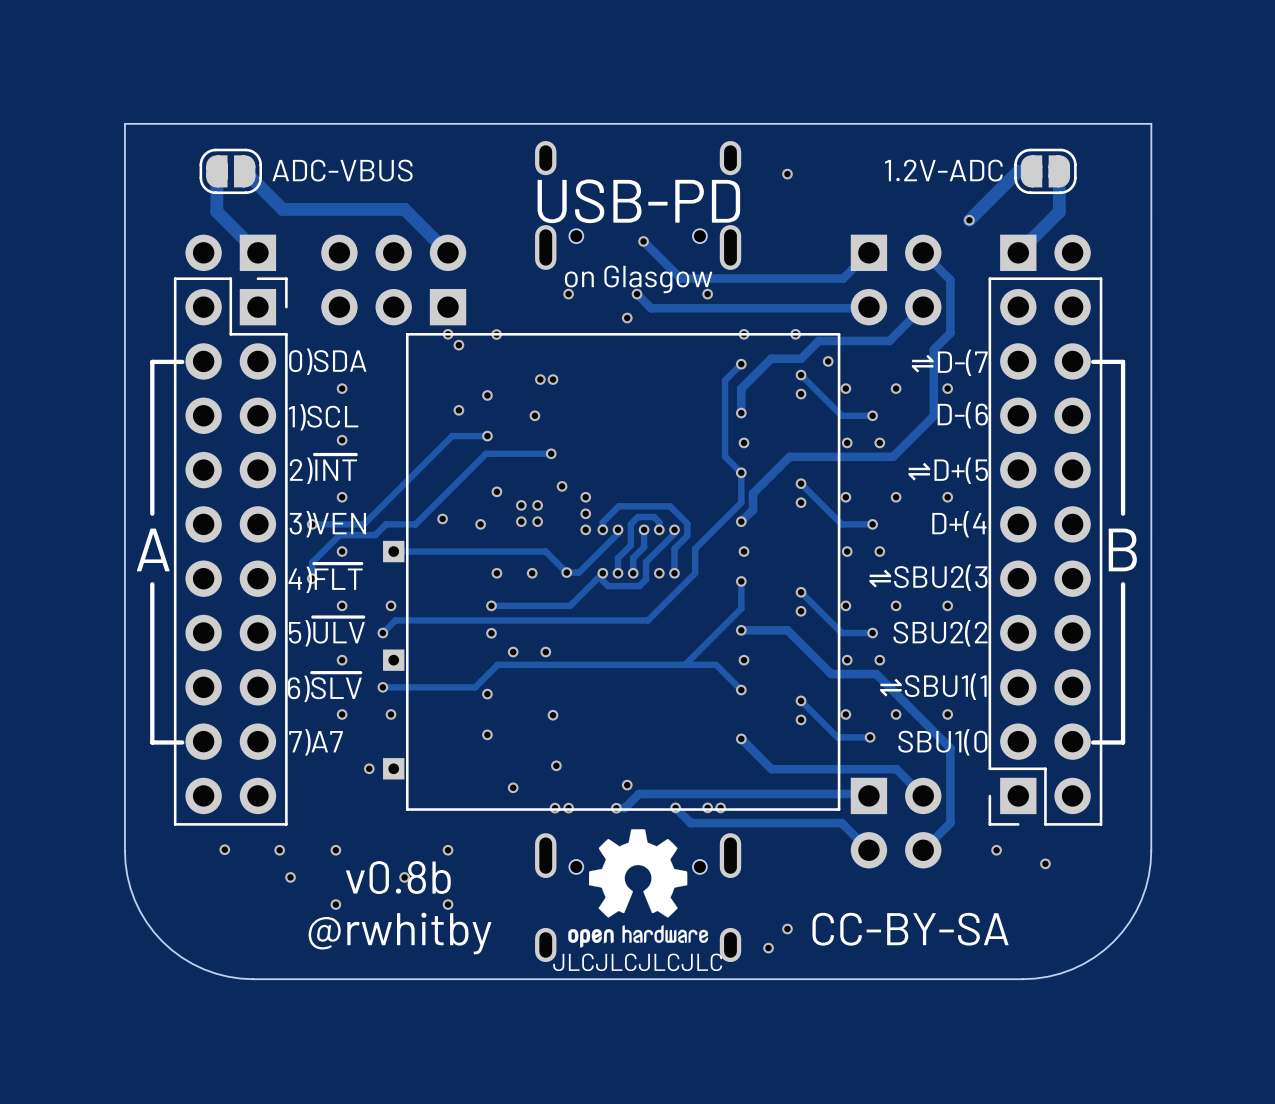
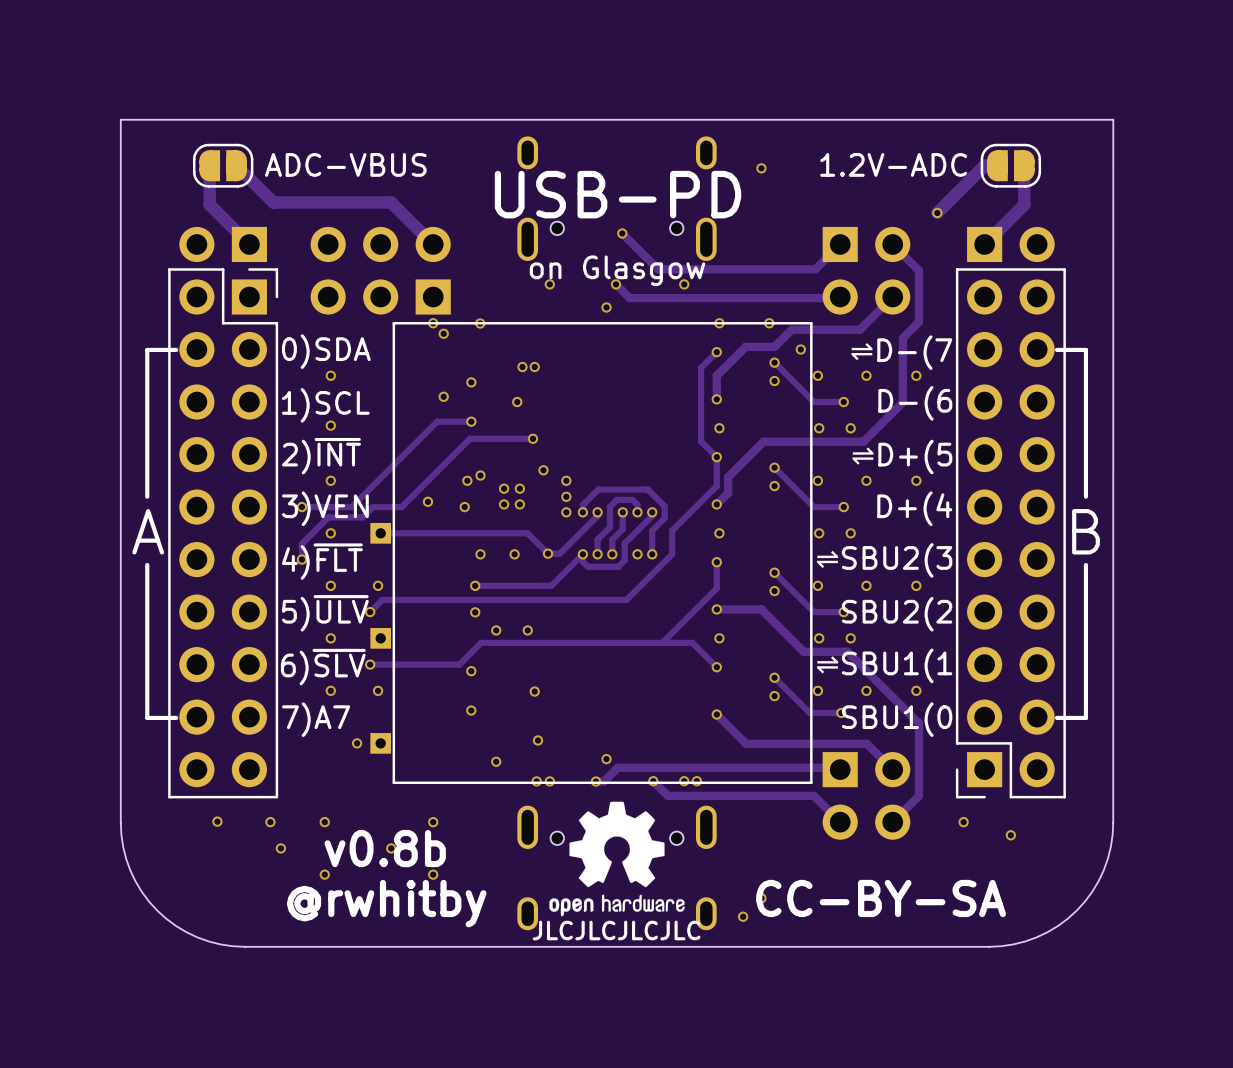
via: none -> (467, 480)

